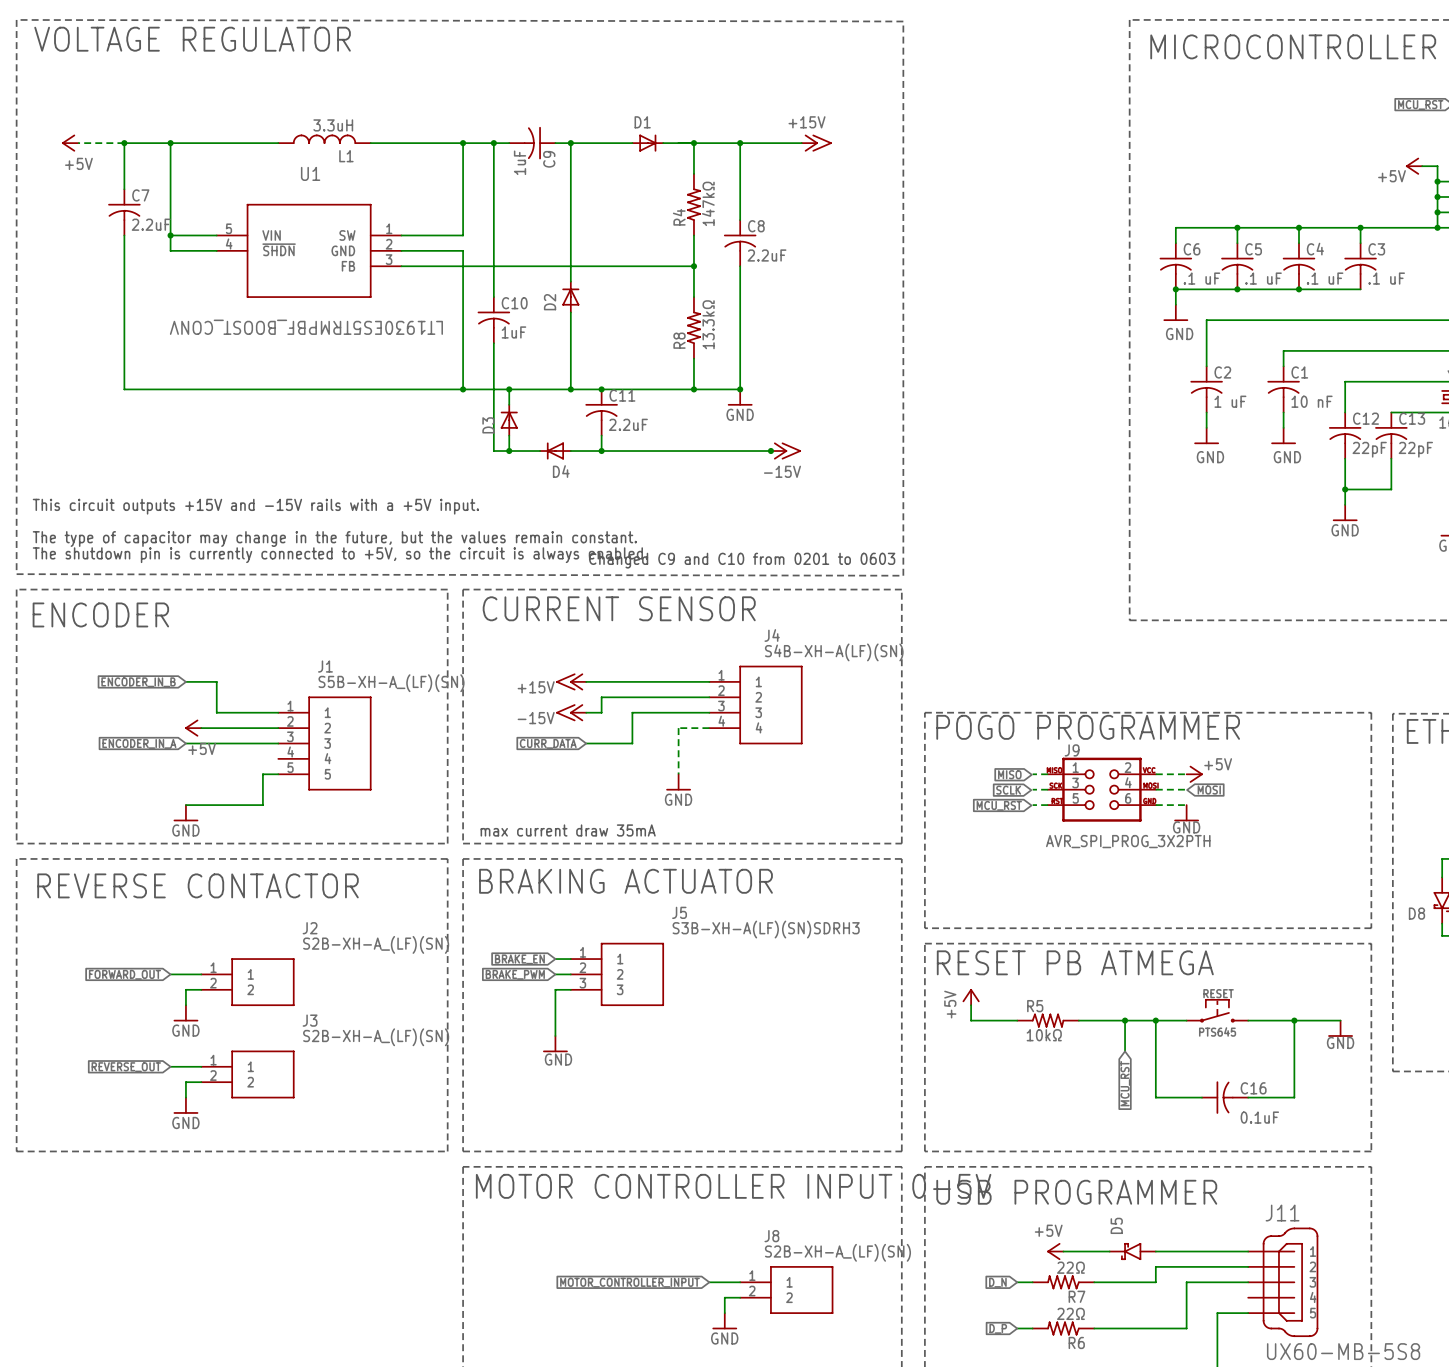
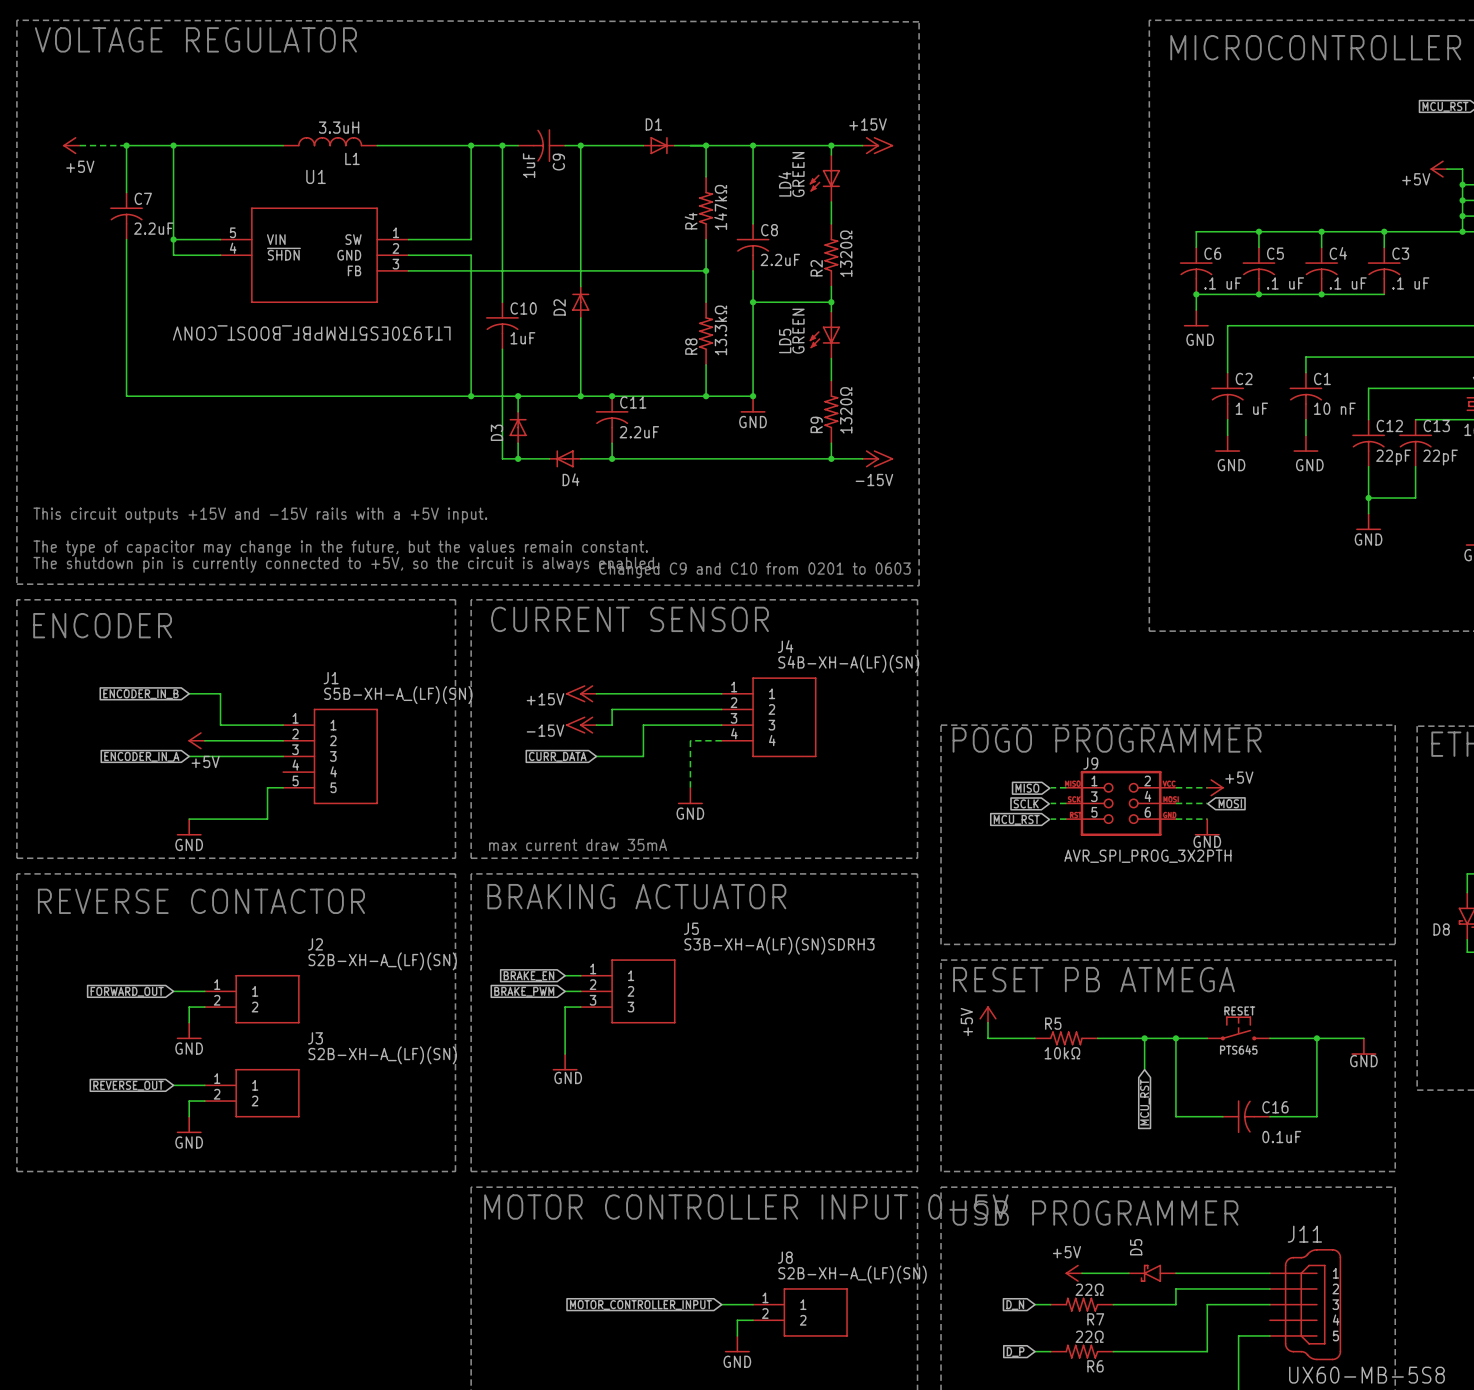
wire: none -> (815, 145) (862, 145)
power symbol position: +15V (816, 143) -> +15V (877, 145)
wire: none -> (831, 145) (831, 155)
junction: none -> (831, 145)
LD4: none -> GREEN (824, 178)
wire: none -> (831, 201) (831, 223)
R2: none -> 1320Ω (831, 255)
wire: none -> (831, 286) (831, 311)
wire: none -> (753, 302) (831, 302)
junction: none -> (753, 302)
junction: none -> (831, 302)
LD5: none -> GREEN (824, 335)
wire: none -> (831, 358) (831, 380)
R9: none -> 1320Ω (831, 411)
wire: none -> (831, 443) (831, 458)
wire: none -> (784, 458) (862, 458)
junction: (770, 451) -> none
power symbol position: -15V (785, 451) -> -15V (877, 458)
junction: none -> (831, 458)

